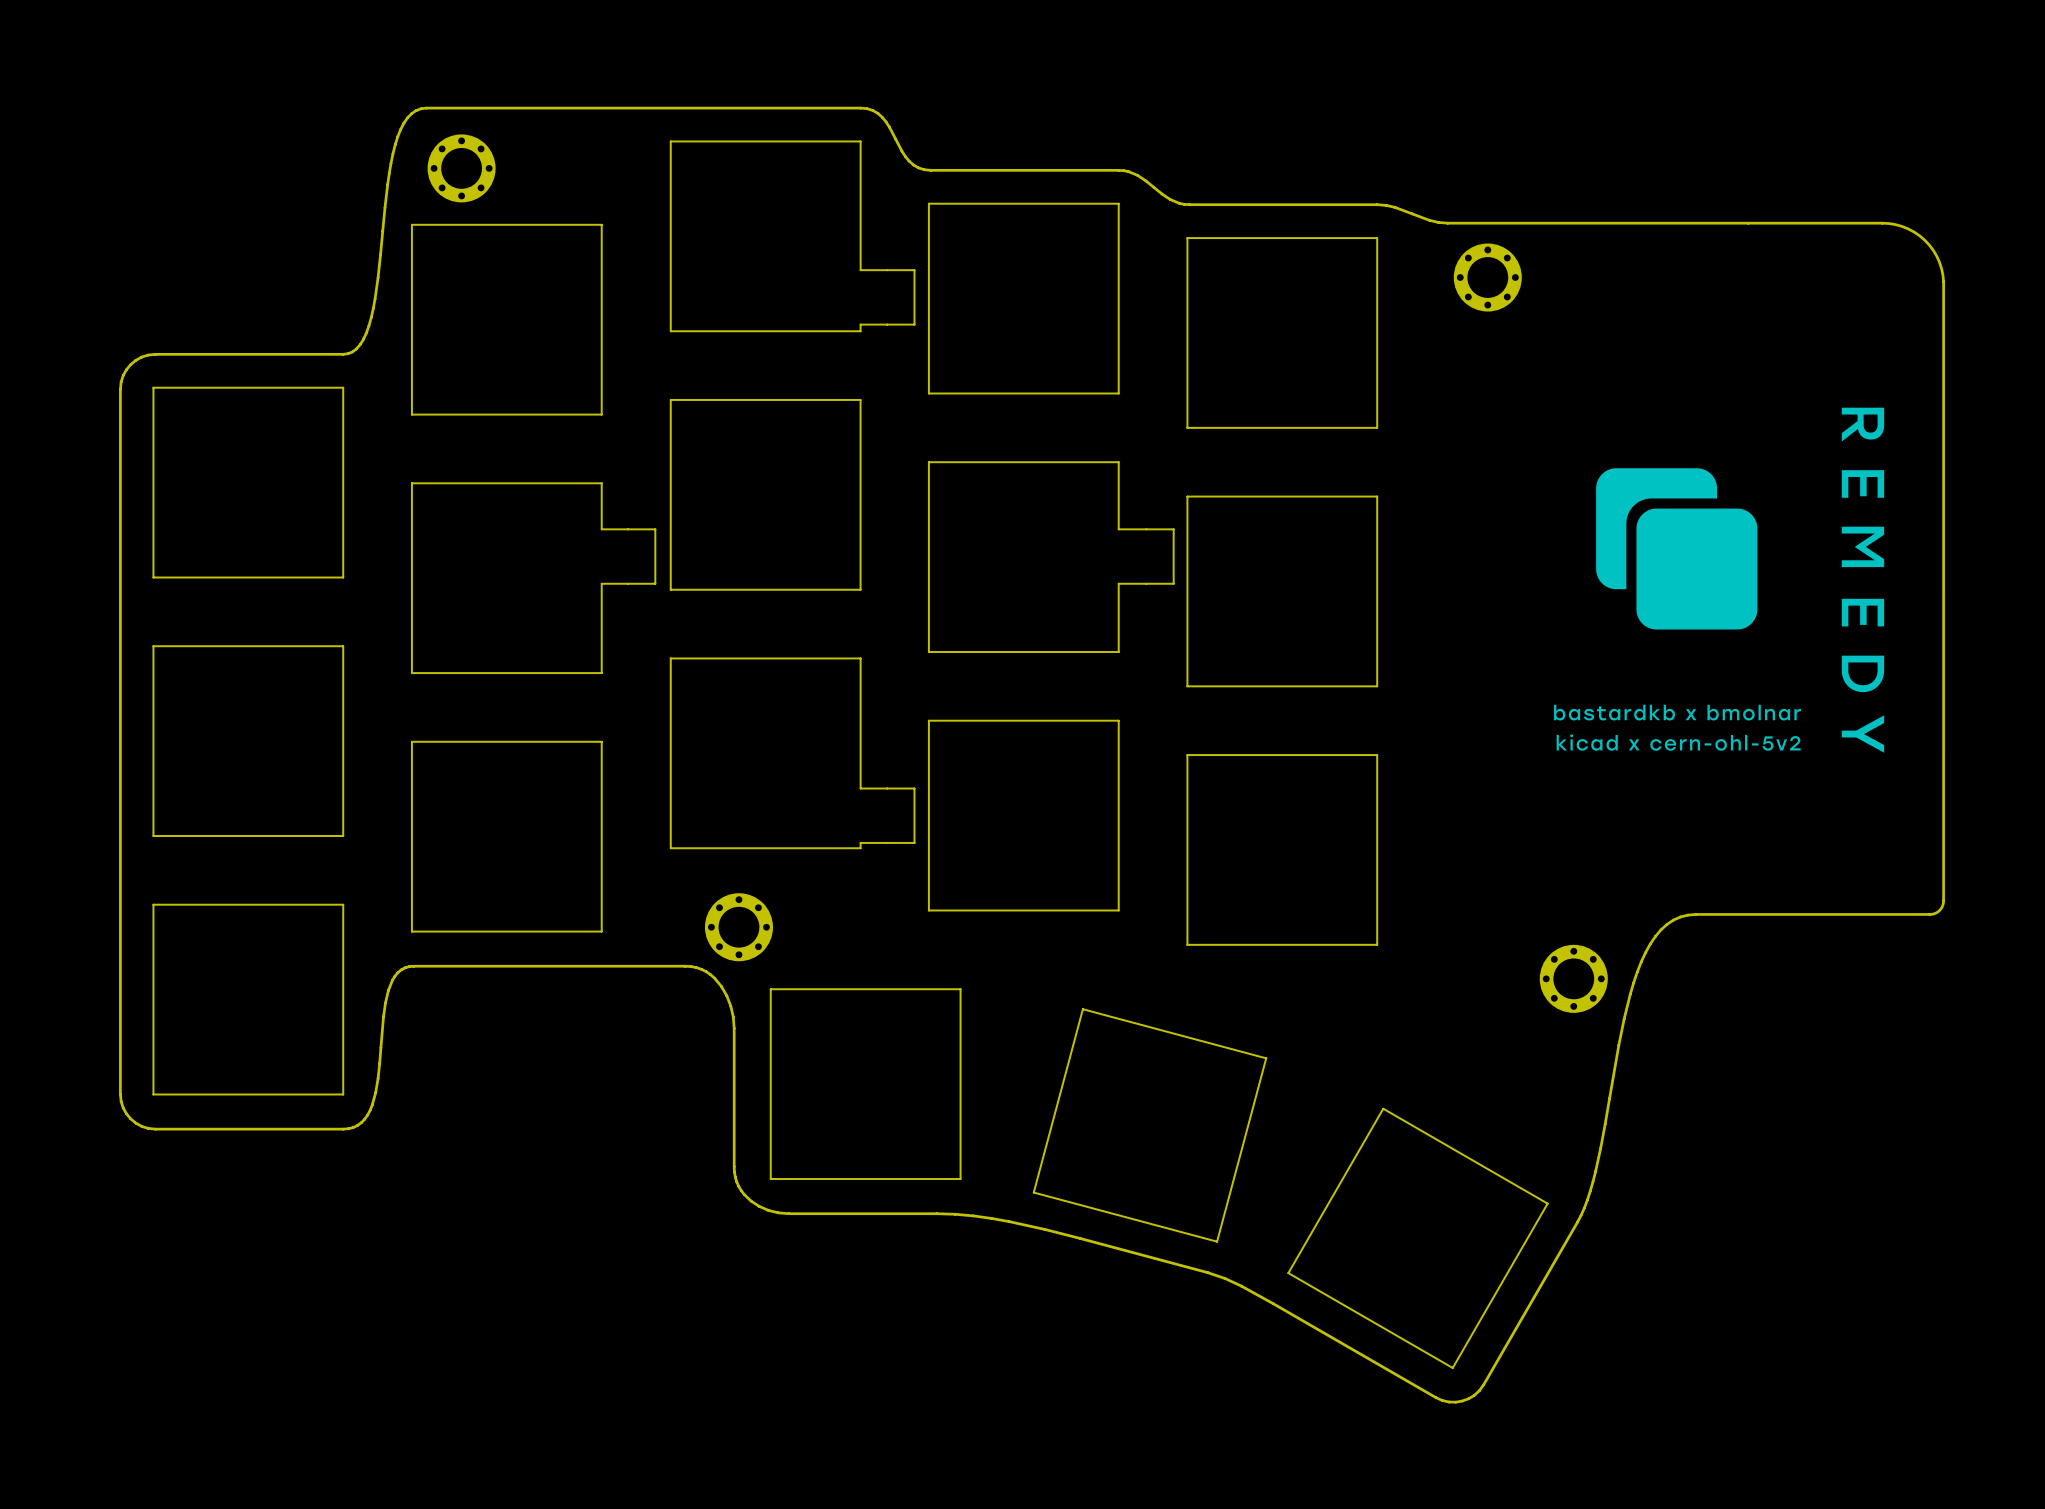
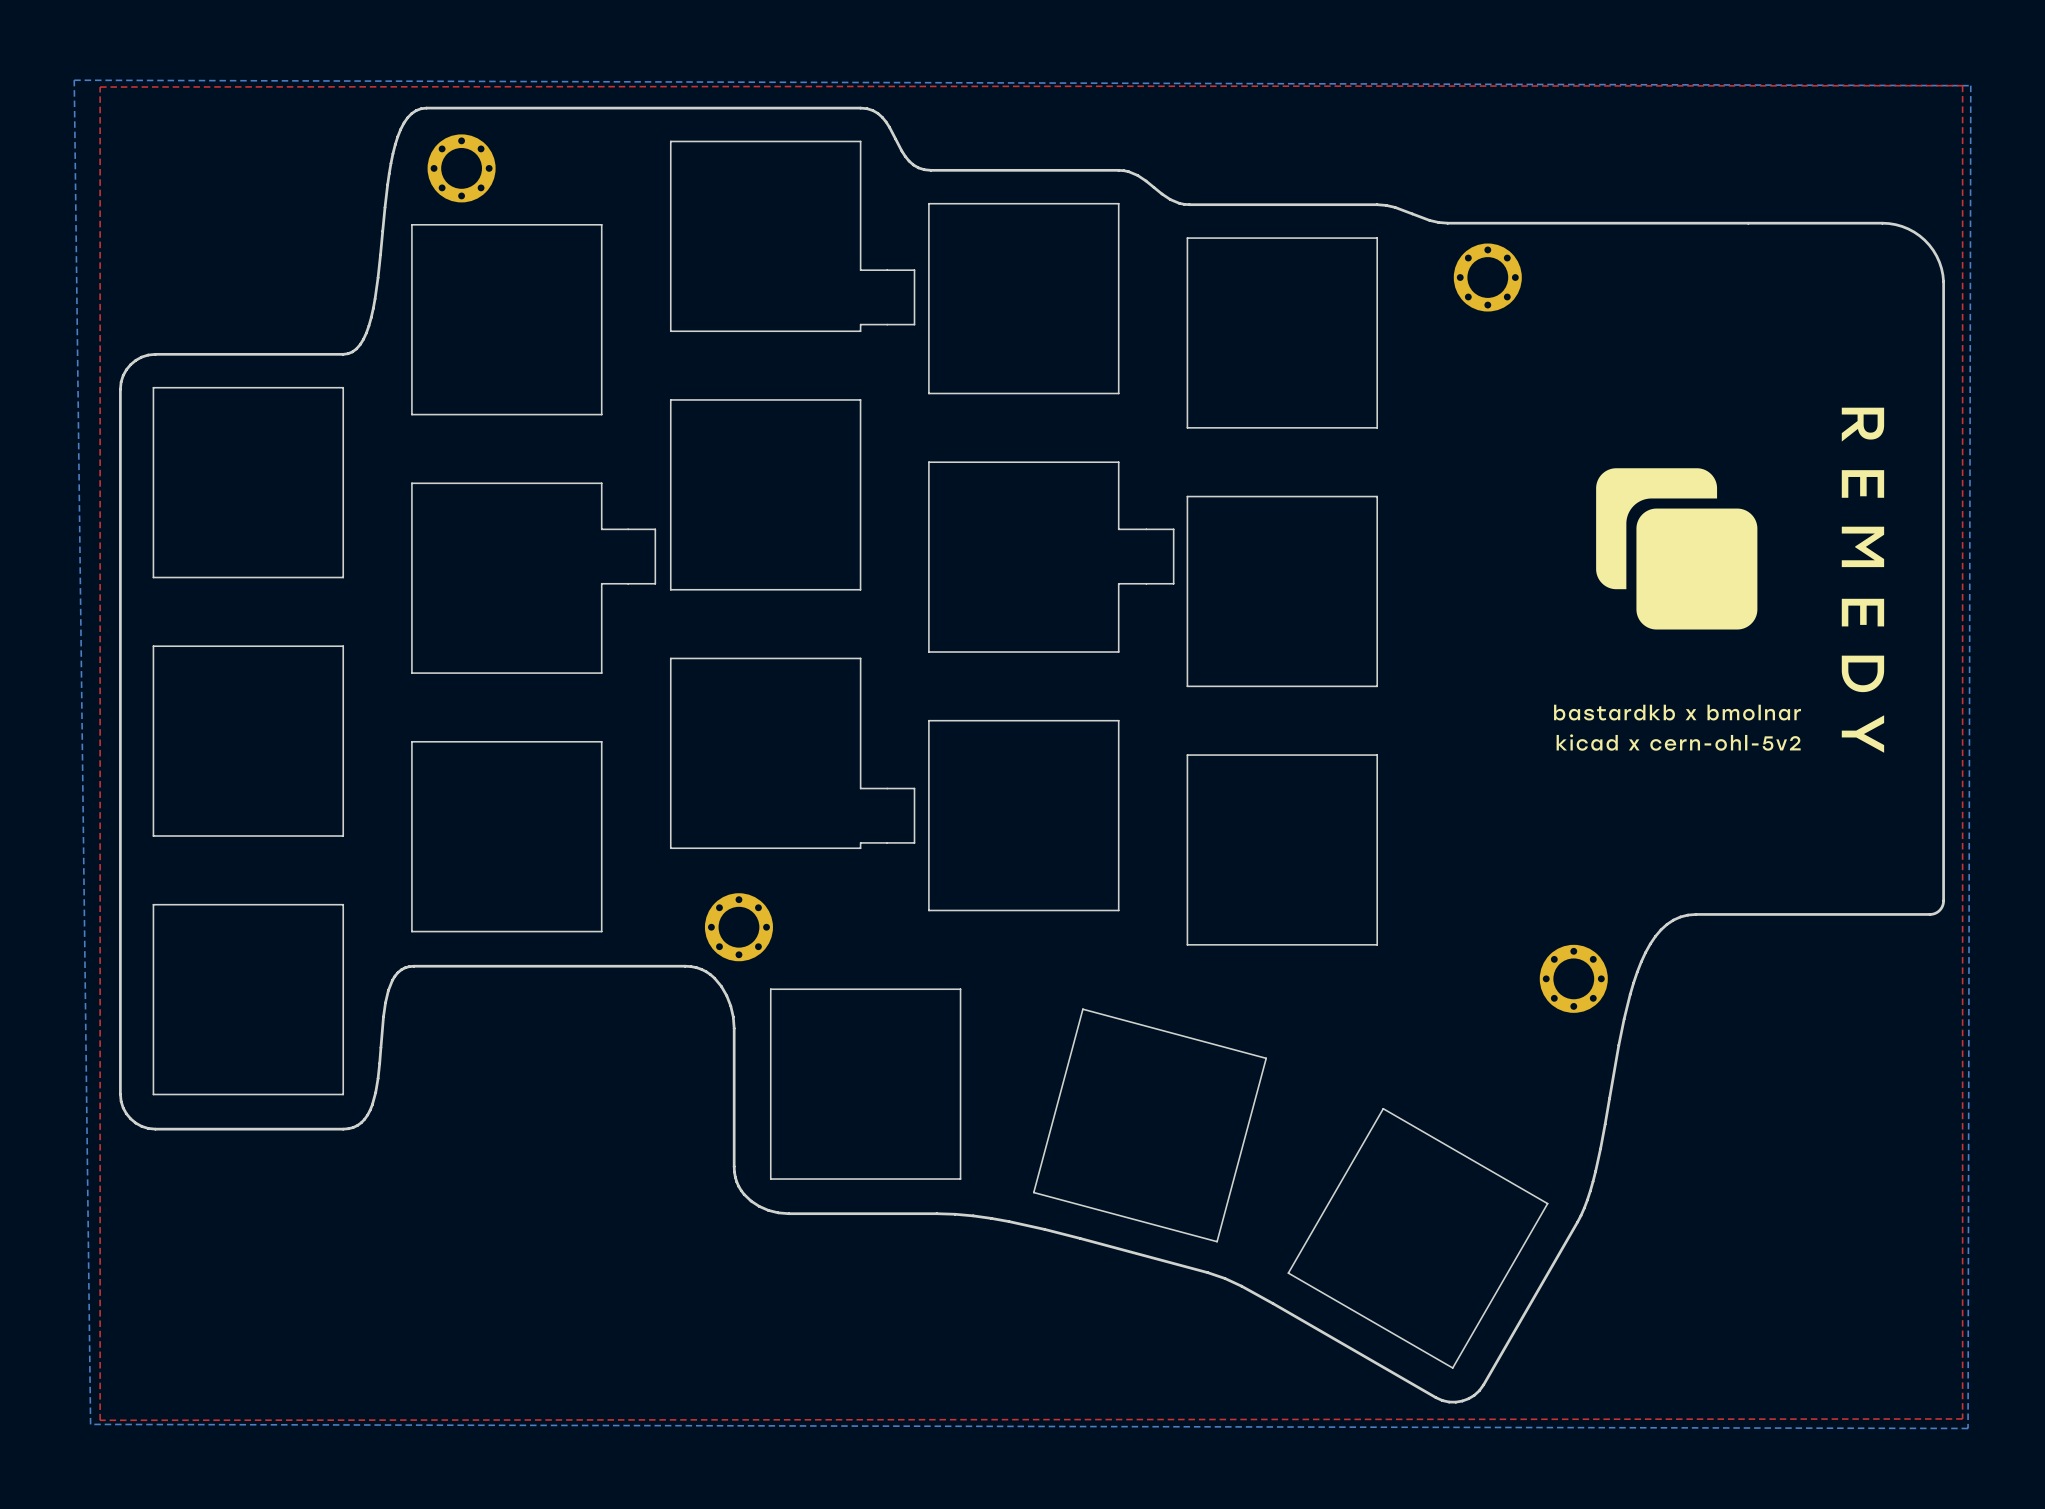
bottom zone outline: none -> (74, 80) (1970, 85) (1968, 1428) (90, 1424) (74, 80)
top zone outline: none -> (1962, 85) (1962, 1418) (100, 1420) (100, 87) (1962, 85)

